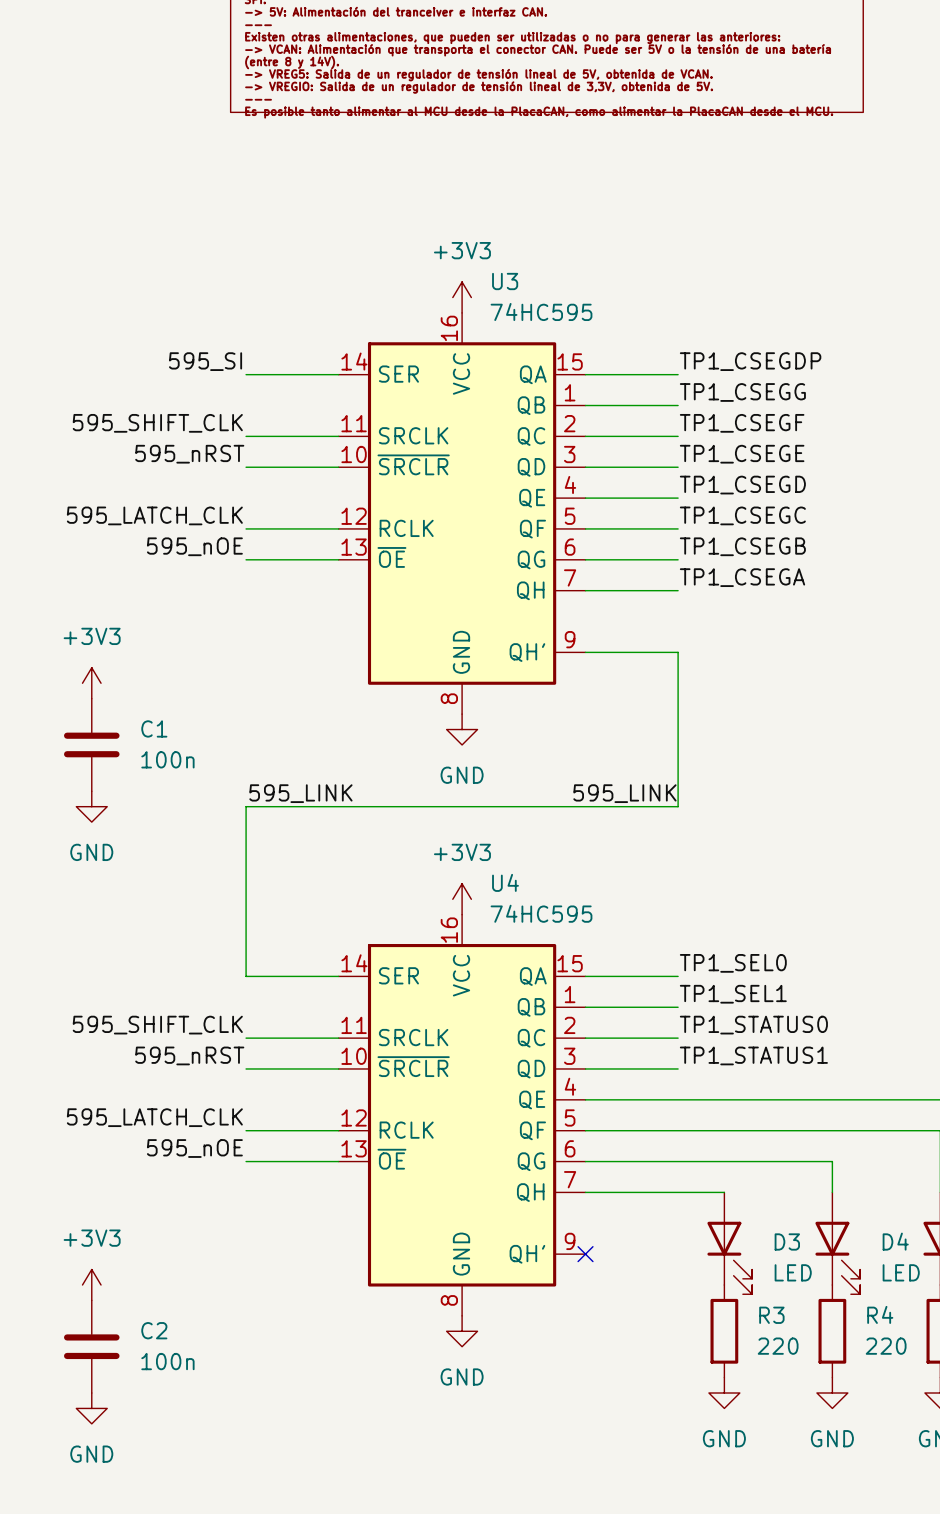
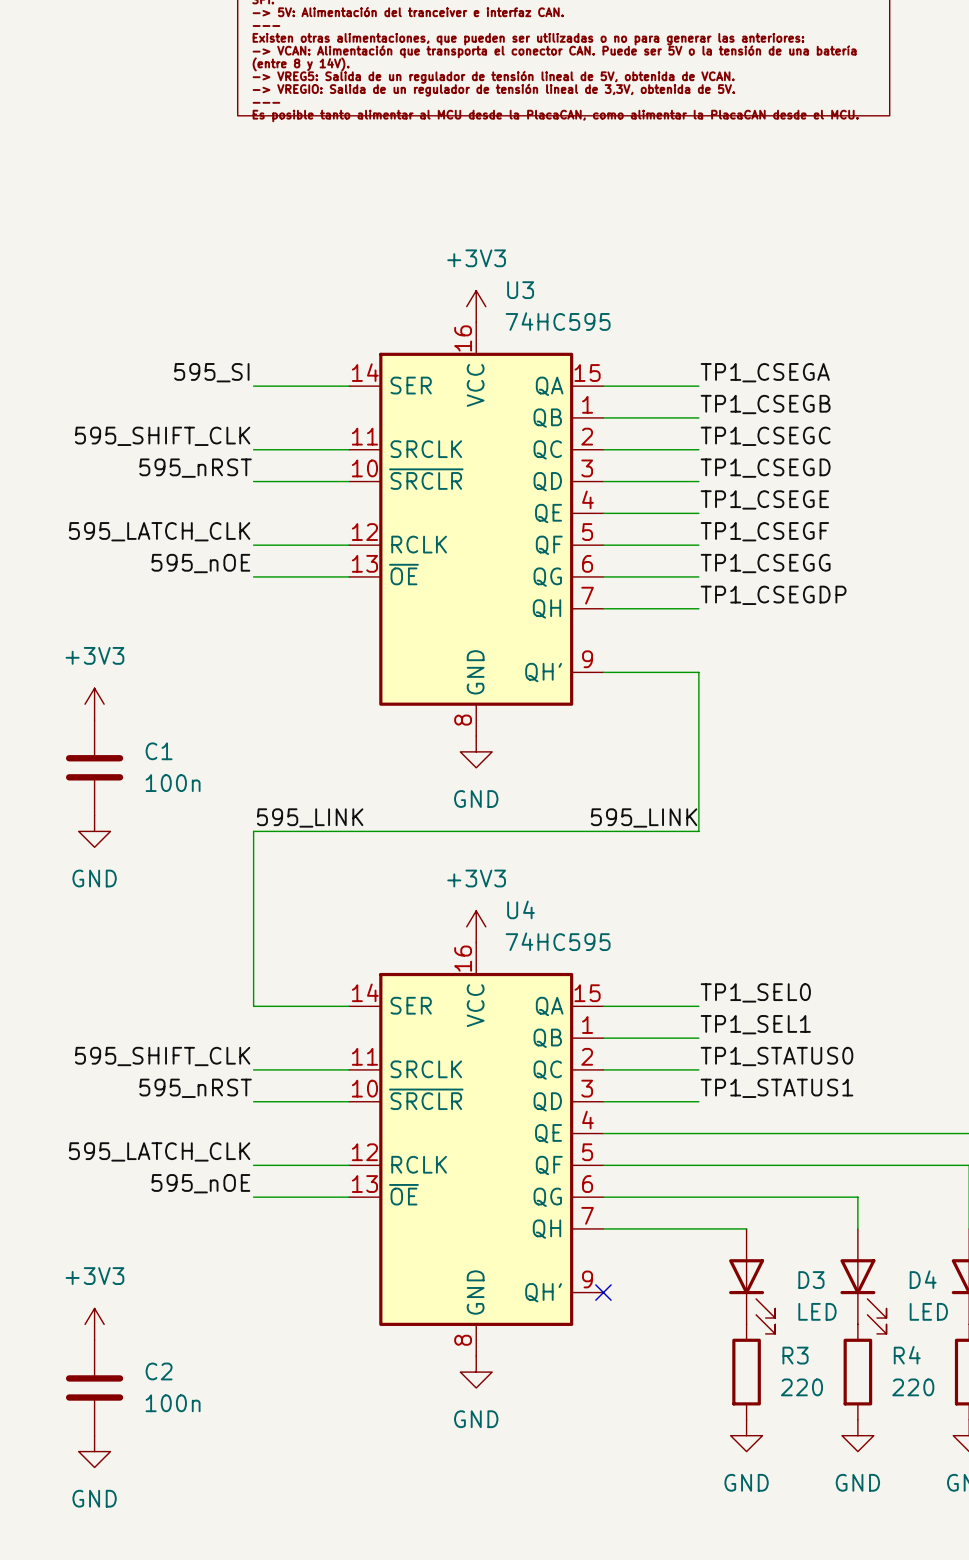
label: TP1_CSEGDP (750, 361) -> TP1_CSEGA (765, 372)
label: TP1_CSEGG (742, 392) -> TP1_CSEGB (765, 404)
label: TP1_CSEGF (742, 423) -> TP1_CSEGC (765, 436)
label: TP1_CSEGE (742, 454) -> TP1_CSEGD (765, 468)
label: TP1_CSEGD (742, 485) -> TP1_CSEGE (764, 499)
label: TP1_CSEGC (742, 515) -> TP1_CSEGF (764, 531)
label: TP1_CSEGB (742, 546) -> TP1_CSEGG (765, 563)
label: TP1_CSEGA (742, 577) -> TP1_CSEGDP (773, 595)

